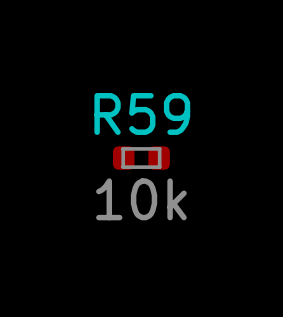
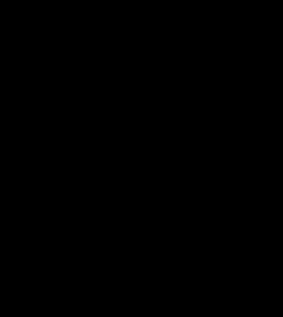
R59: 10k (141, 158) -> none

